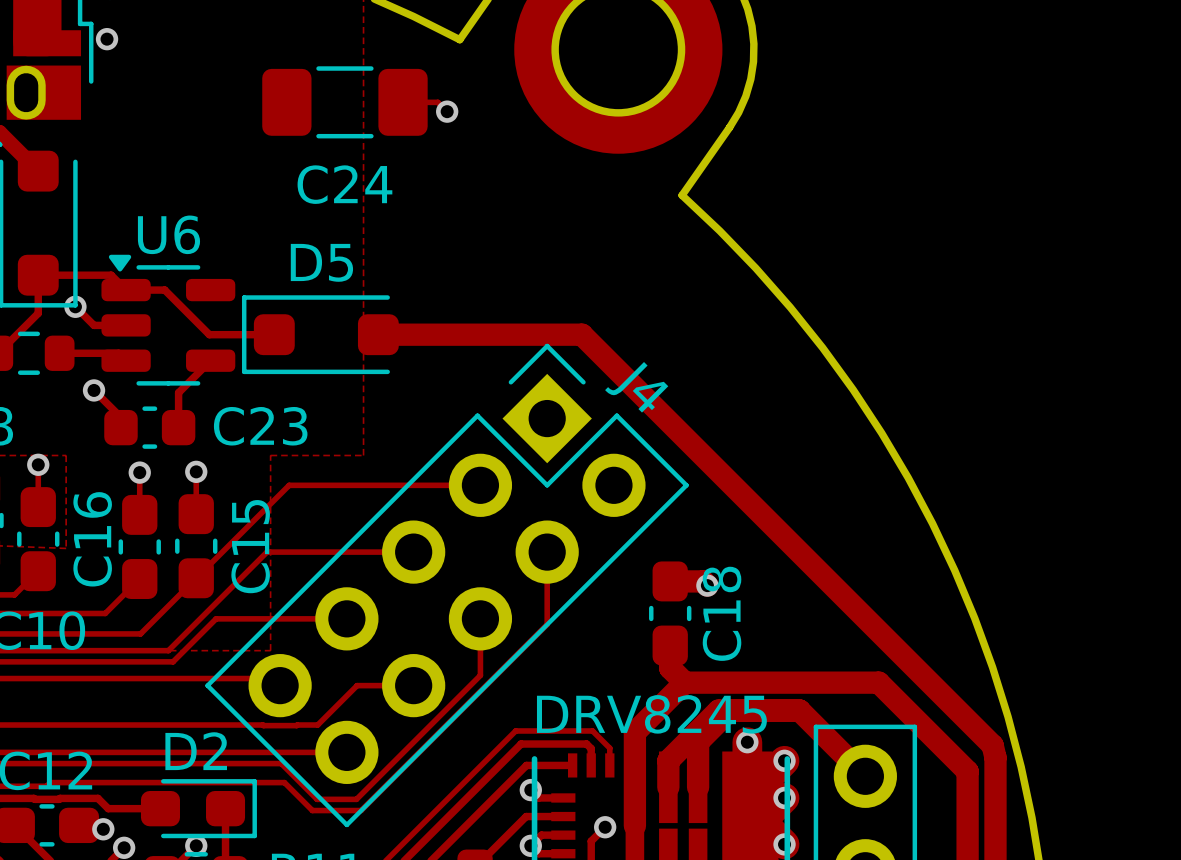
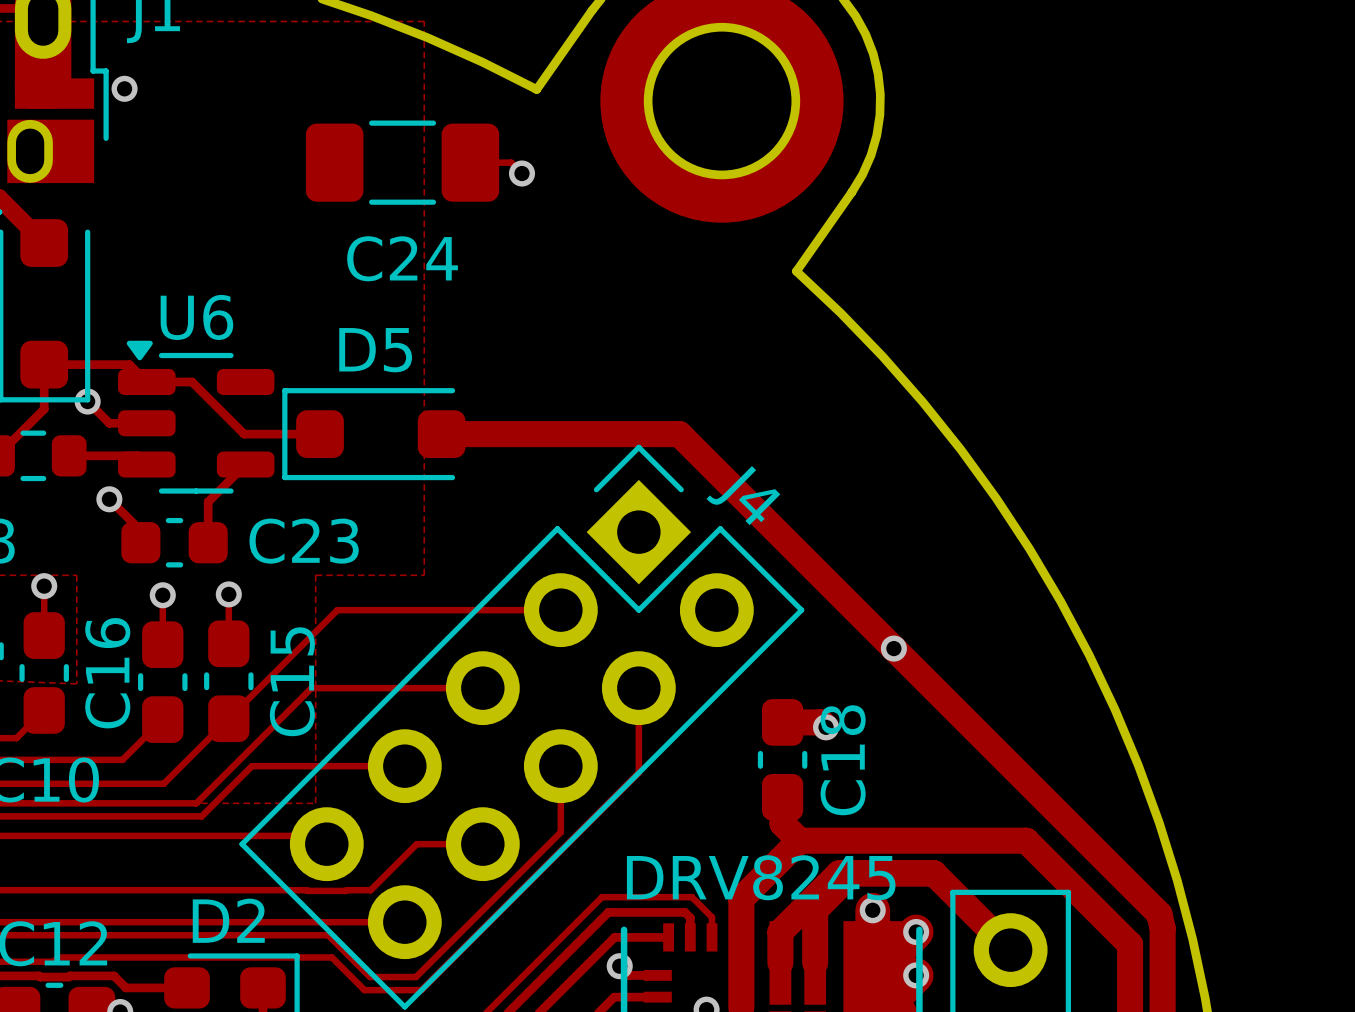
via: none -> (893, 648)

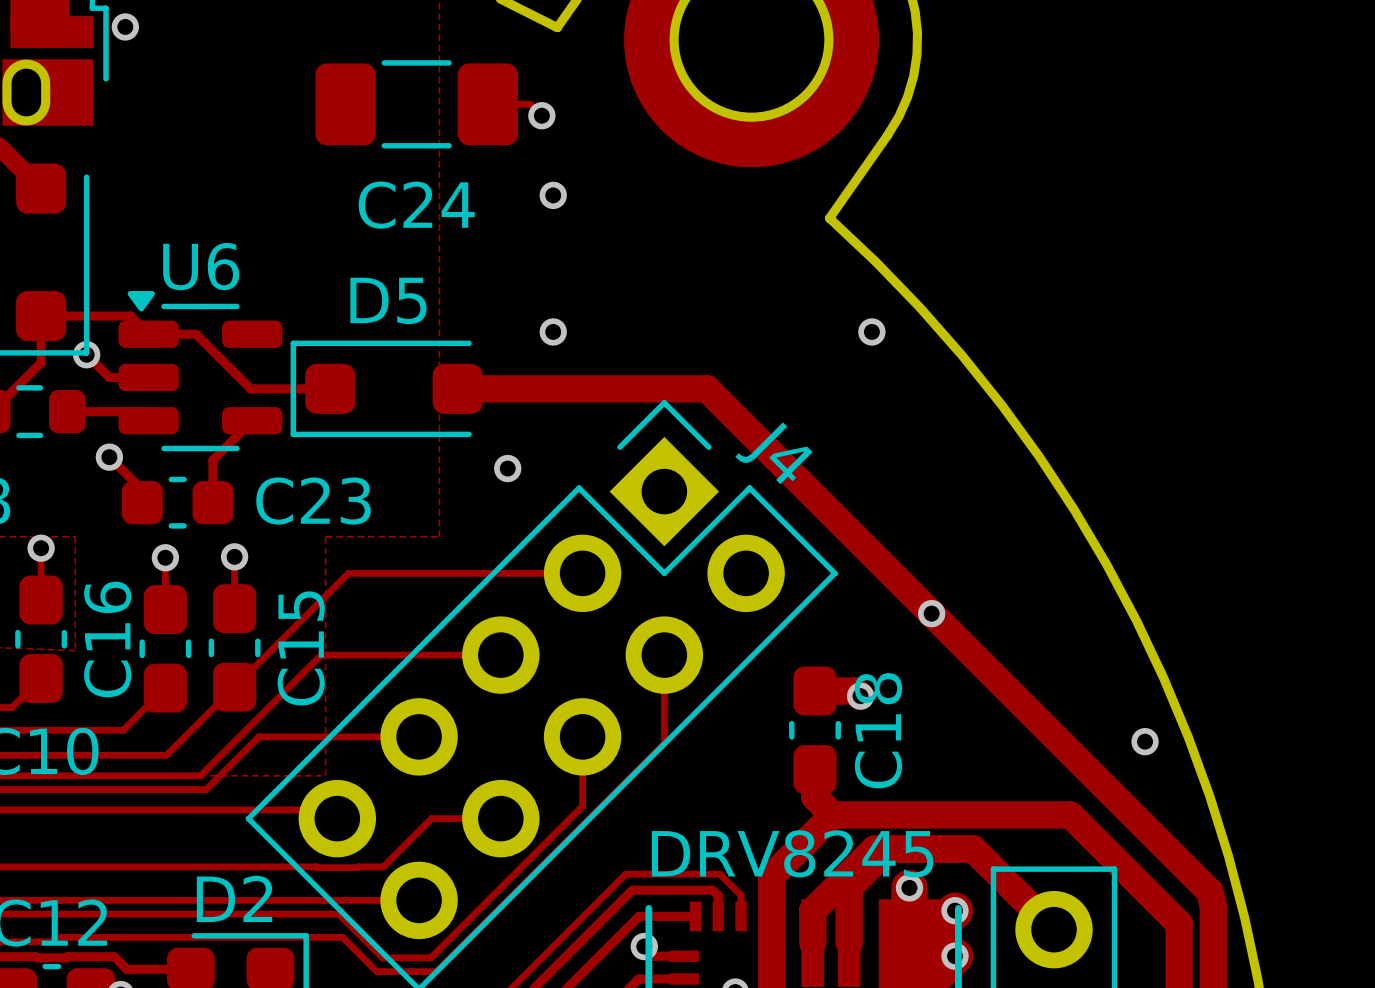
via: none -> (553, 195)
via: none -> (553, 331)
via: none -> (871, 331)
via: none -> (507, 468)
via: none -> (1145, 741)

